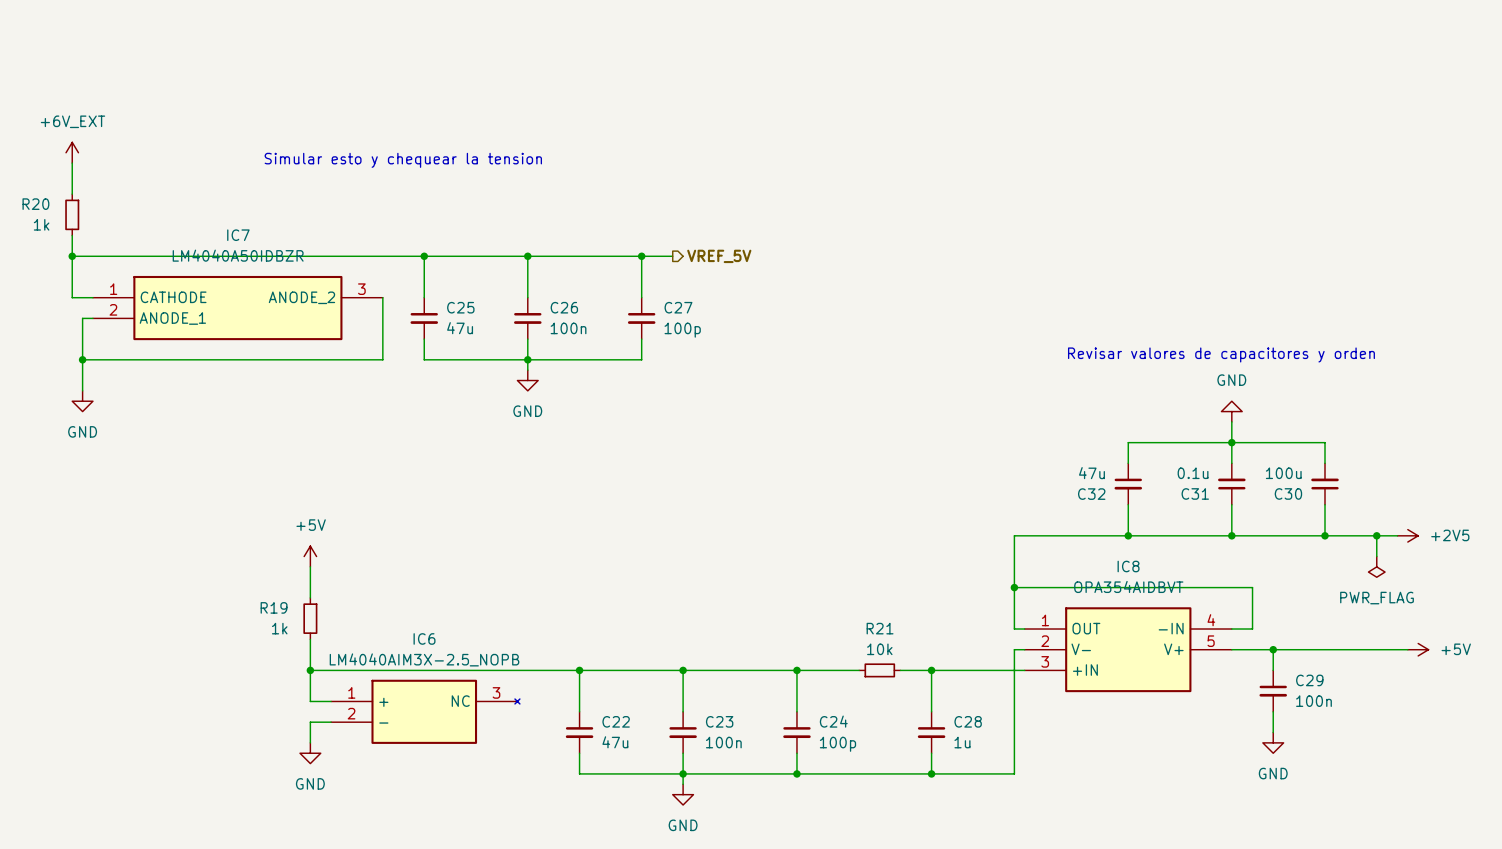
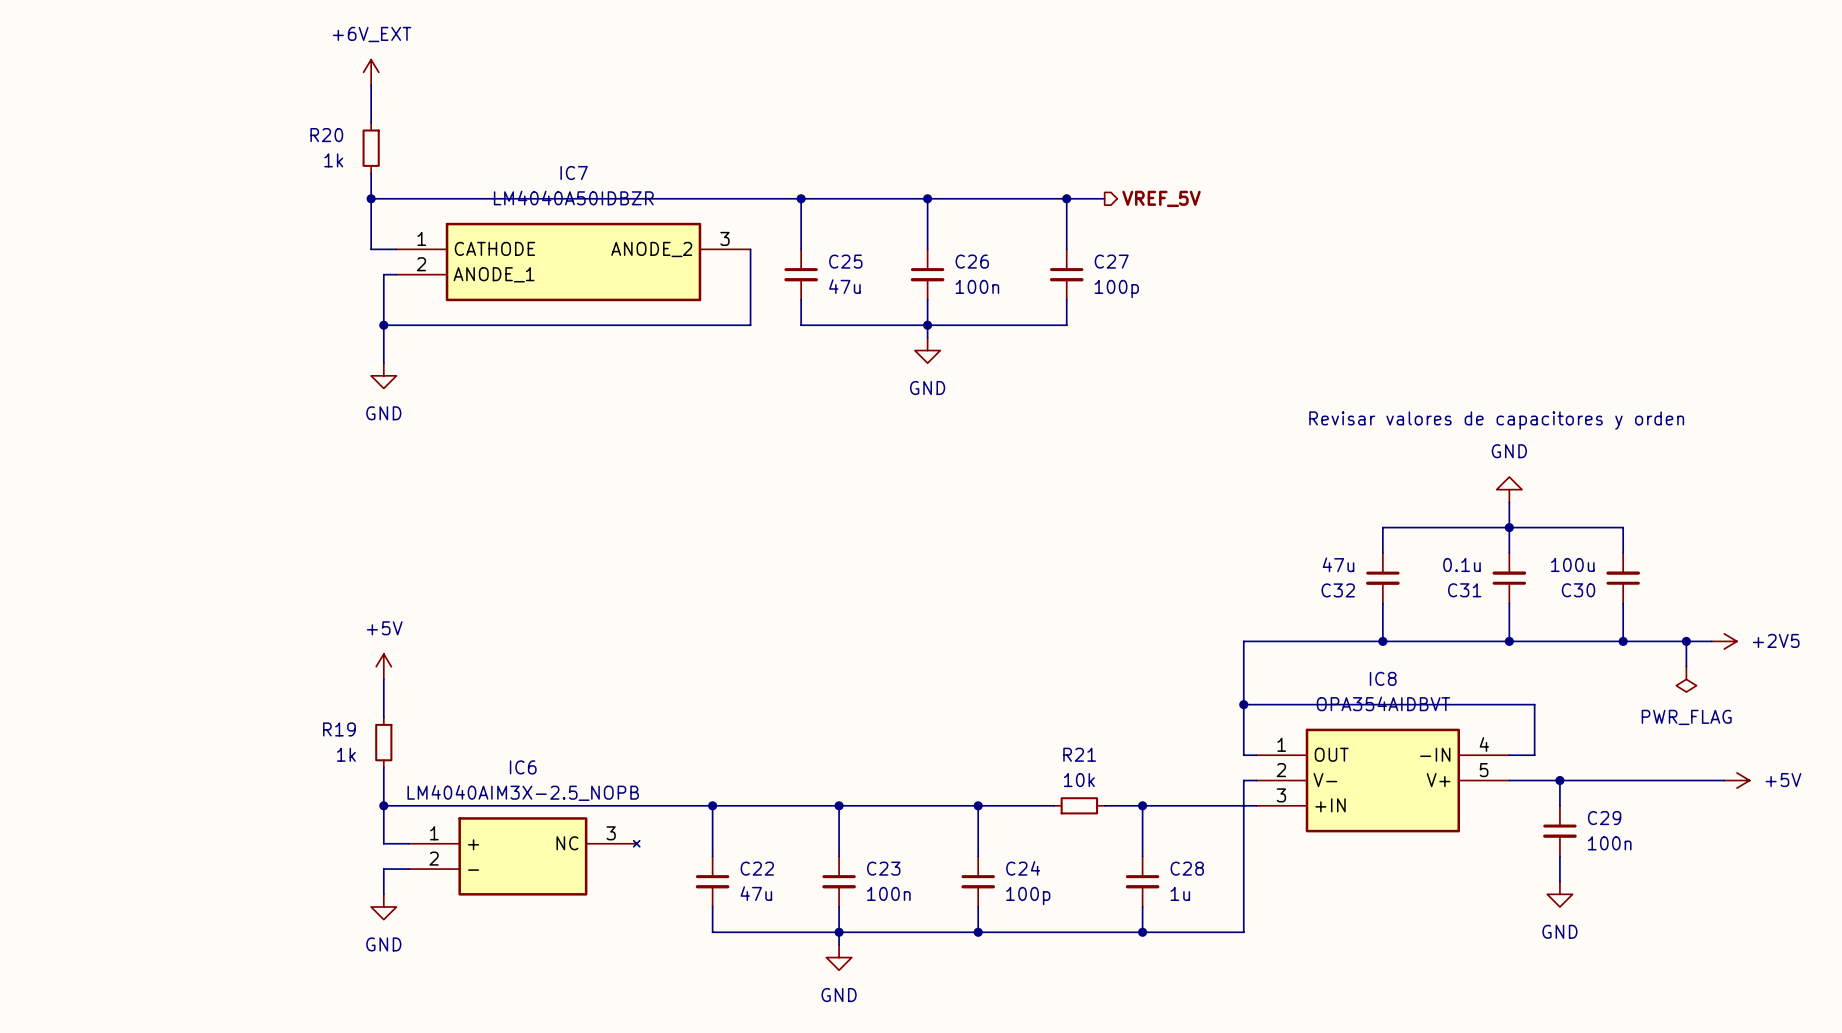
power symbol: none -> +6V_EXT (371, 72)
wire: none -> (371, 84) (371, 122)
power symbol: +6V_EXT (72, 152) -> none
wire: none -> (371, 173) (371, 249) (396, 249)
text: Simular esto y chequear la tension (403, 160) -> none
wire: (72, 163) (72, 194) -> none
wire: none -> (371, 198) (1104, 198)
junction: none -> (371, 198)
junction: none -> (801, 198)
wire: none -> (927, 198) (927, 249)
junction: none -> (927, 198)
wire: none -> (1066, 198) (1066, 249)
junction: none -> (1066, 198)
hierarchical label: none -> VREF_5V (1161, 198)
R20 position: (72, 214) -> (371, 148)
wire: none -> (750, 249) (750, 325) (383, 325)
wire: (72, 235) (72, 297) (92, 297) -> none
wire: none -> (396, 274) (383, 274) (383, 363)
wire: (72, 256) (672, 256) -> none
junction: (72, 256) -> none
wire: (424, 256) (424, 297) -> none
junction: (424, 256) -> none
wire: (527, 256) (527, 297) -> none
junction: (527, 256) -> none
wire: (641, 256) (641, 297) -> (801, 198) (801, 249)
junction: (641, 256) -> none
wire: none -> (801, 299) (801, 325) (1066, 325) (1066, 299)
hierarchical label: VREF_5V (719, 256) -> none
wire: none -> (927, 299) (927, 337)
junction: none -> (383, 325)
junction: none -> (927, 325)
wire: (382, 297) (382, 359) (82, 359) -> none
power symbol: none -> GND (927, 350)
IC7 position: (237, 308) -> (573, 262)
wire: (92, 318) (82, 318) (82, 390) -> none
power symbol: none -> GND (383, 375)
C25 position: (424, 318) -> (801, 274)
C26 position: (527, 318) -> (927, 274)
C27 position: (641, 318) -> (1066, 274)
wire: (424, 339) (424, 359) (641, 359) (641, 339) -> none
wire: (527, 339) (527, 370) -> none
junction: (82, 359) -> none
junction: (527, 359) -> none
power symbol: GND (527, 380) -> none
power symbol: GND (82, 401) -> none

